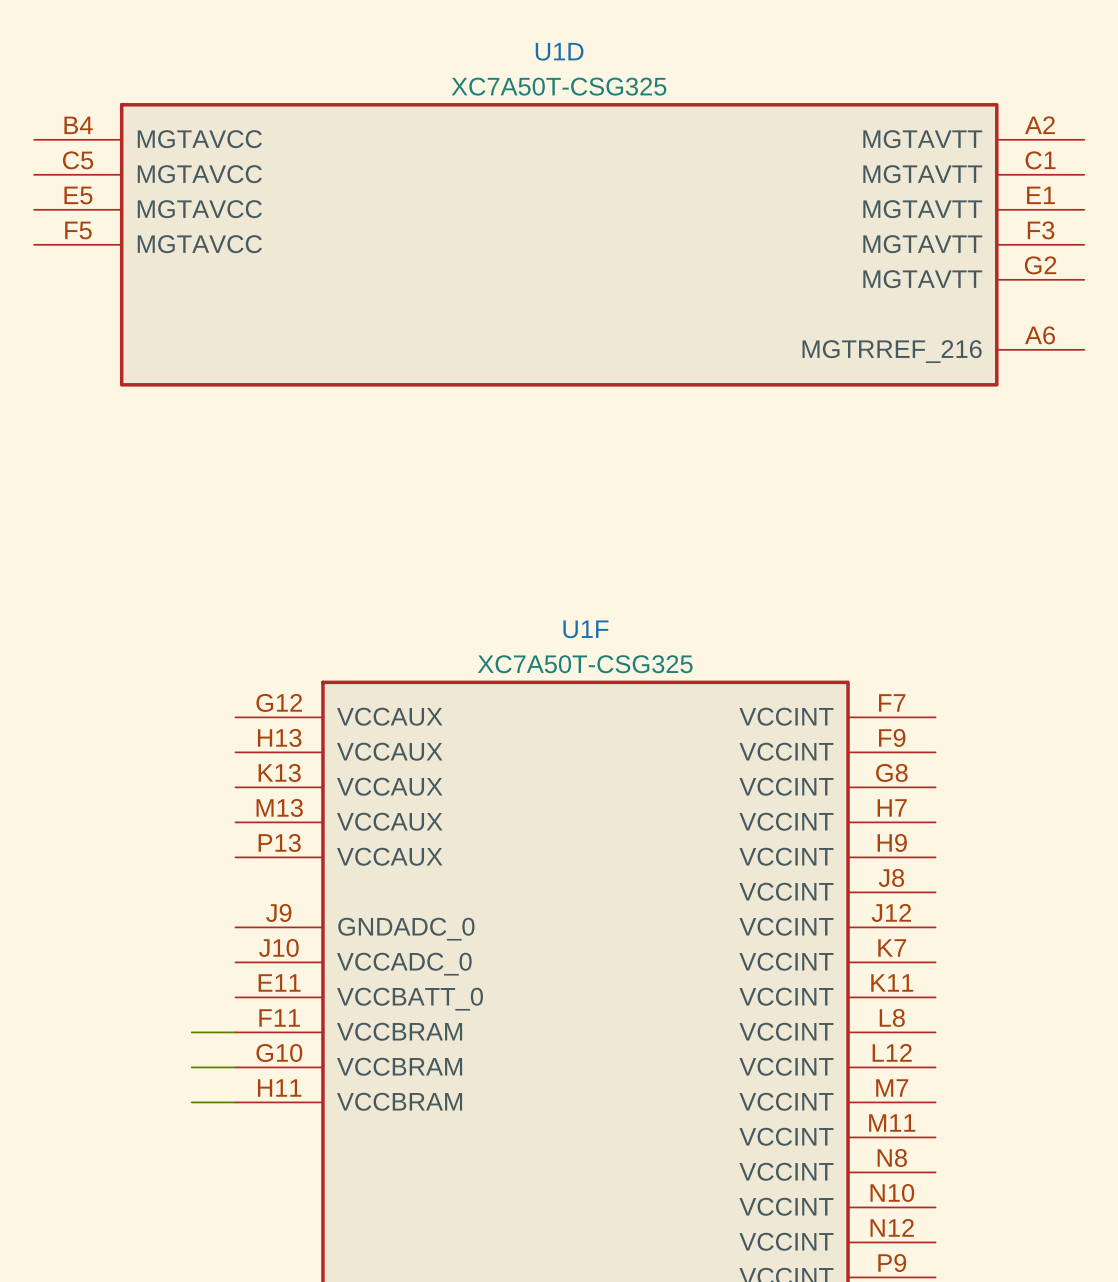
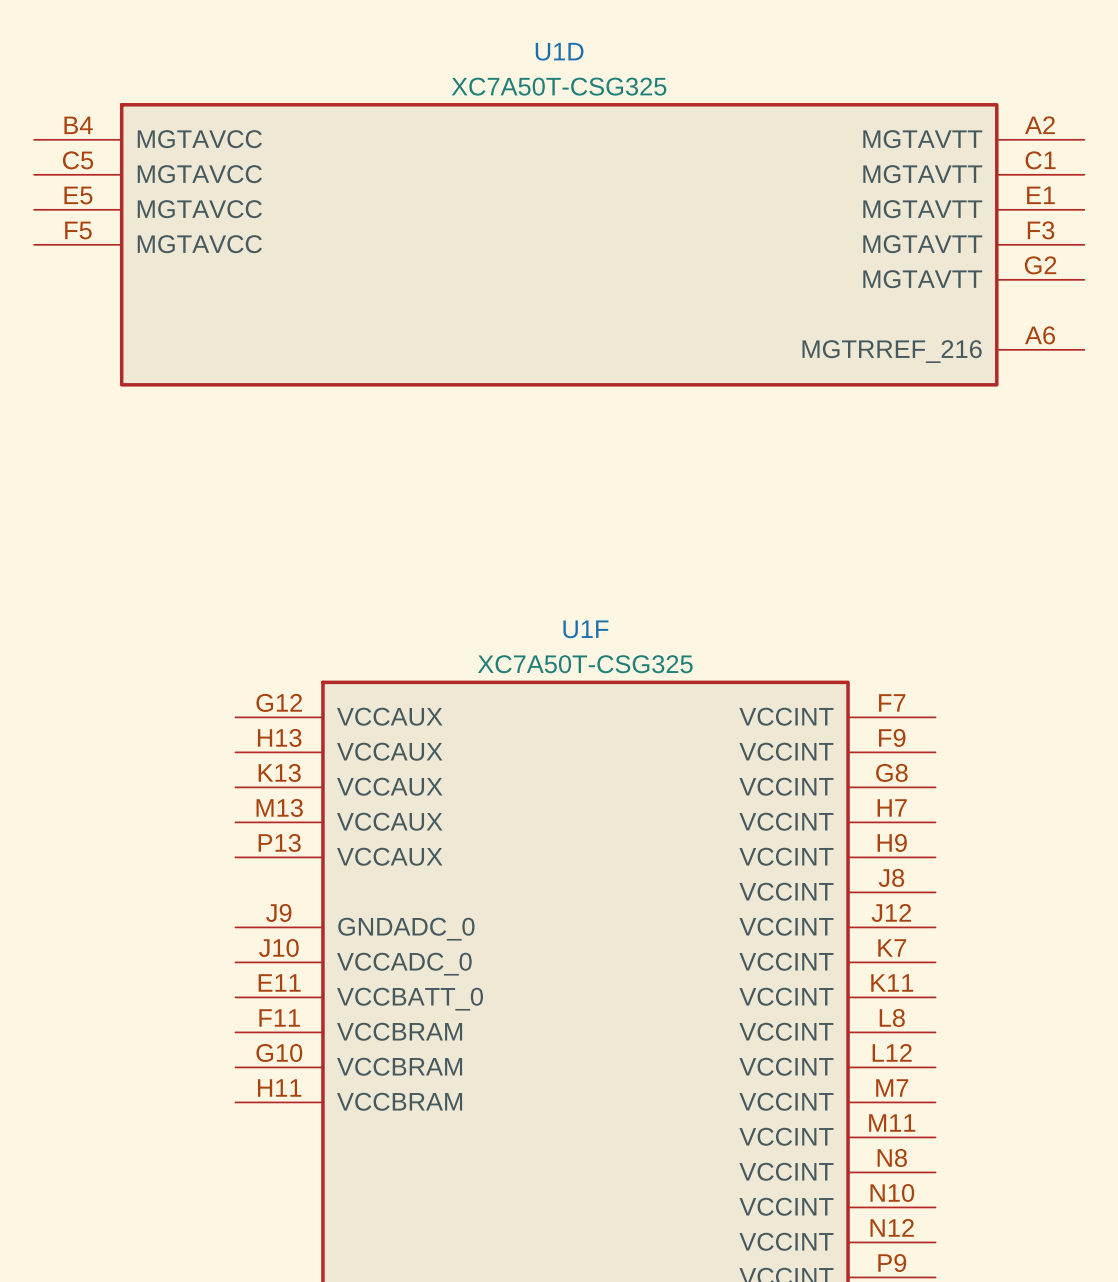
wire: (191, 1032) (235, 1032) -> none
wire: (191, 1067) (235, 1067) -> none
wire: (191, 1102) (235, 1102) -> none

